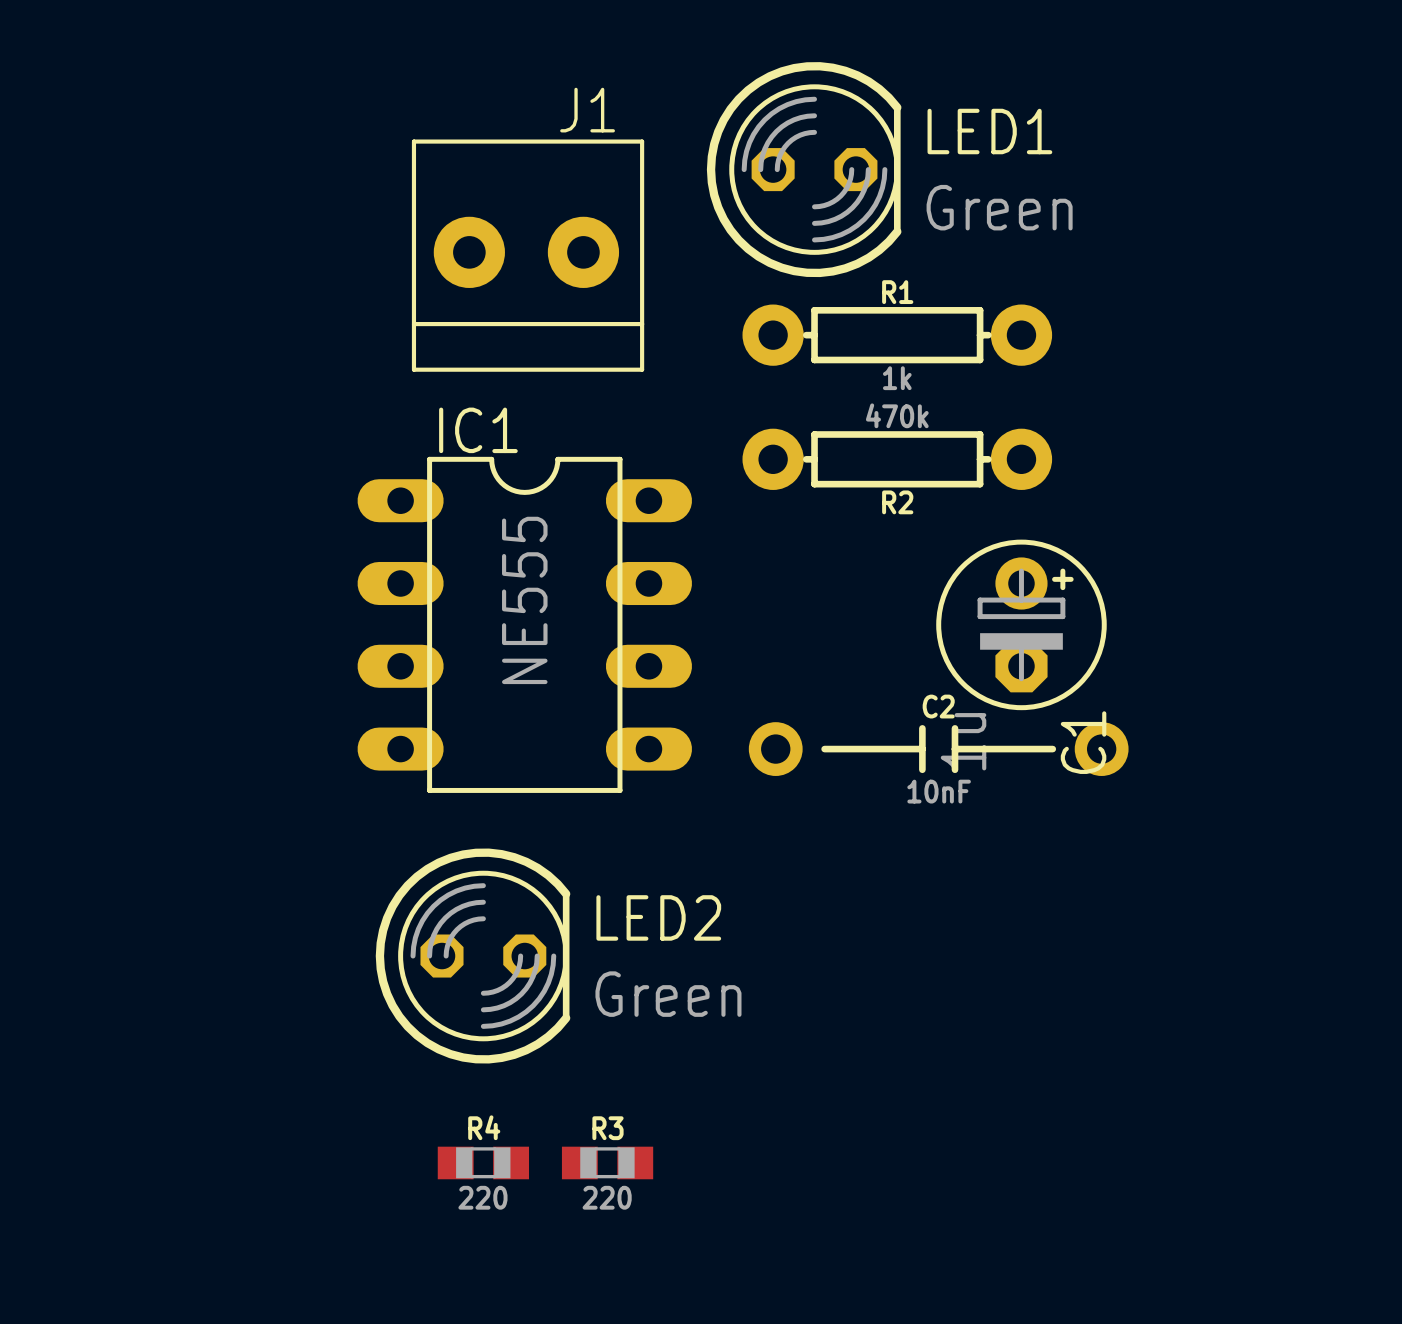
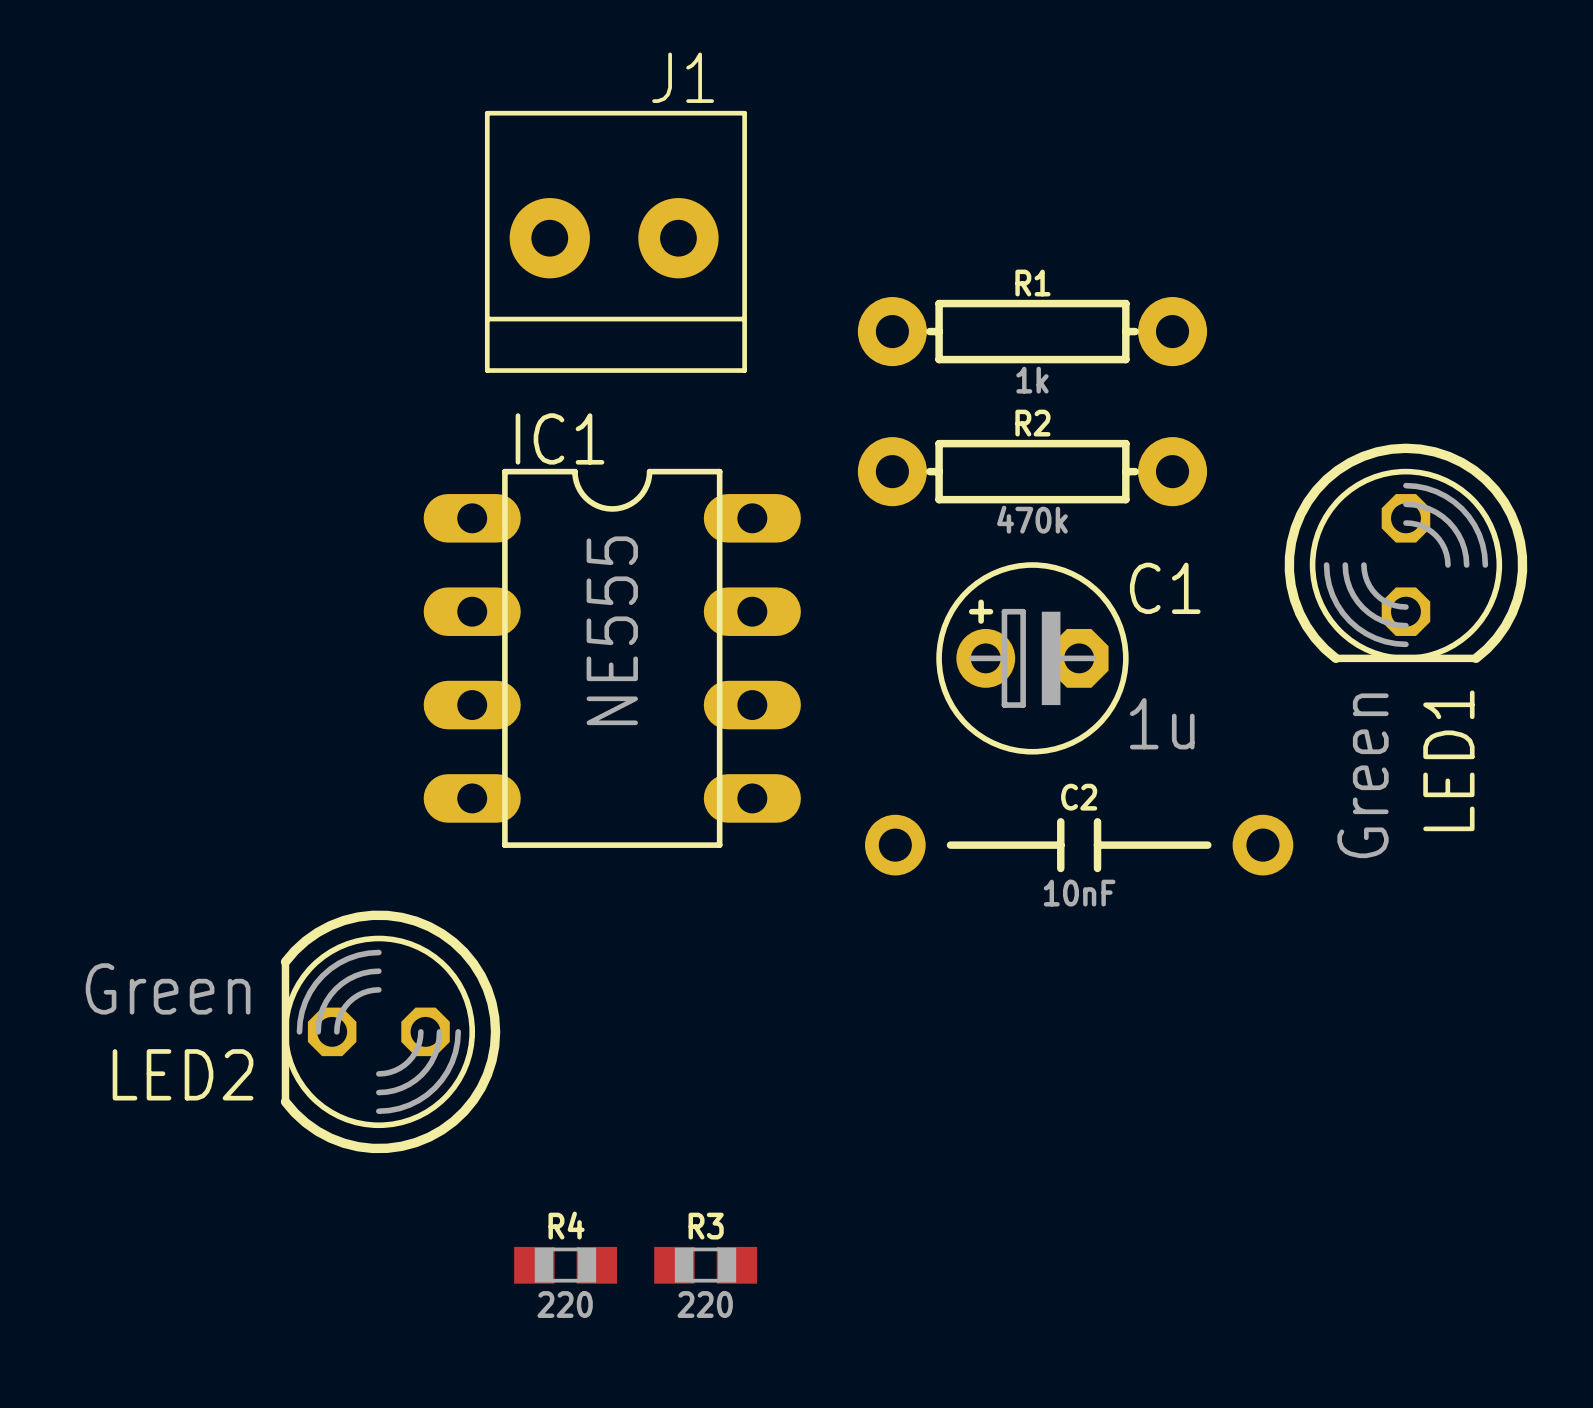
LED1 rotation: 0° (804, 169) -> 90° clockwise (1405, 553)
LED1 position: (804, 169) -> (1405, 553)
R2 value position: 470k (897, 415) -> 470k (1032, 519)
R2 name position: R2 (897, 502) -> R2 (1032, 423)
C1 rotation: 0° (1021, 624) -> 90° counterclockwise (1032, 658)
C1 position: (1021, 624) -> (1032, 658)
C2 position: (938, 749) -> (1079, 845)
LED2 rotation: 0° (473, 956) -> 180° (390, 1031)
LED2 position: (473, 956) -> (390, 1031)

